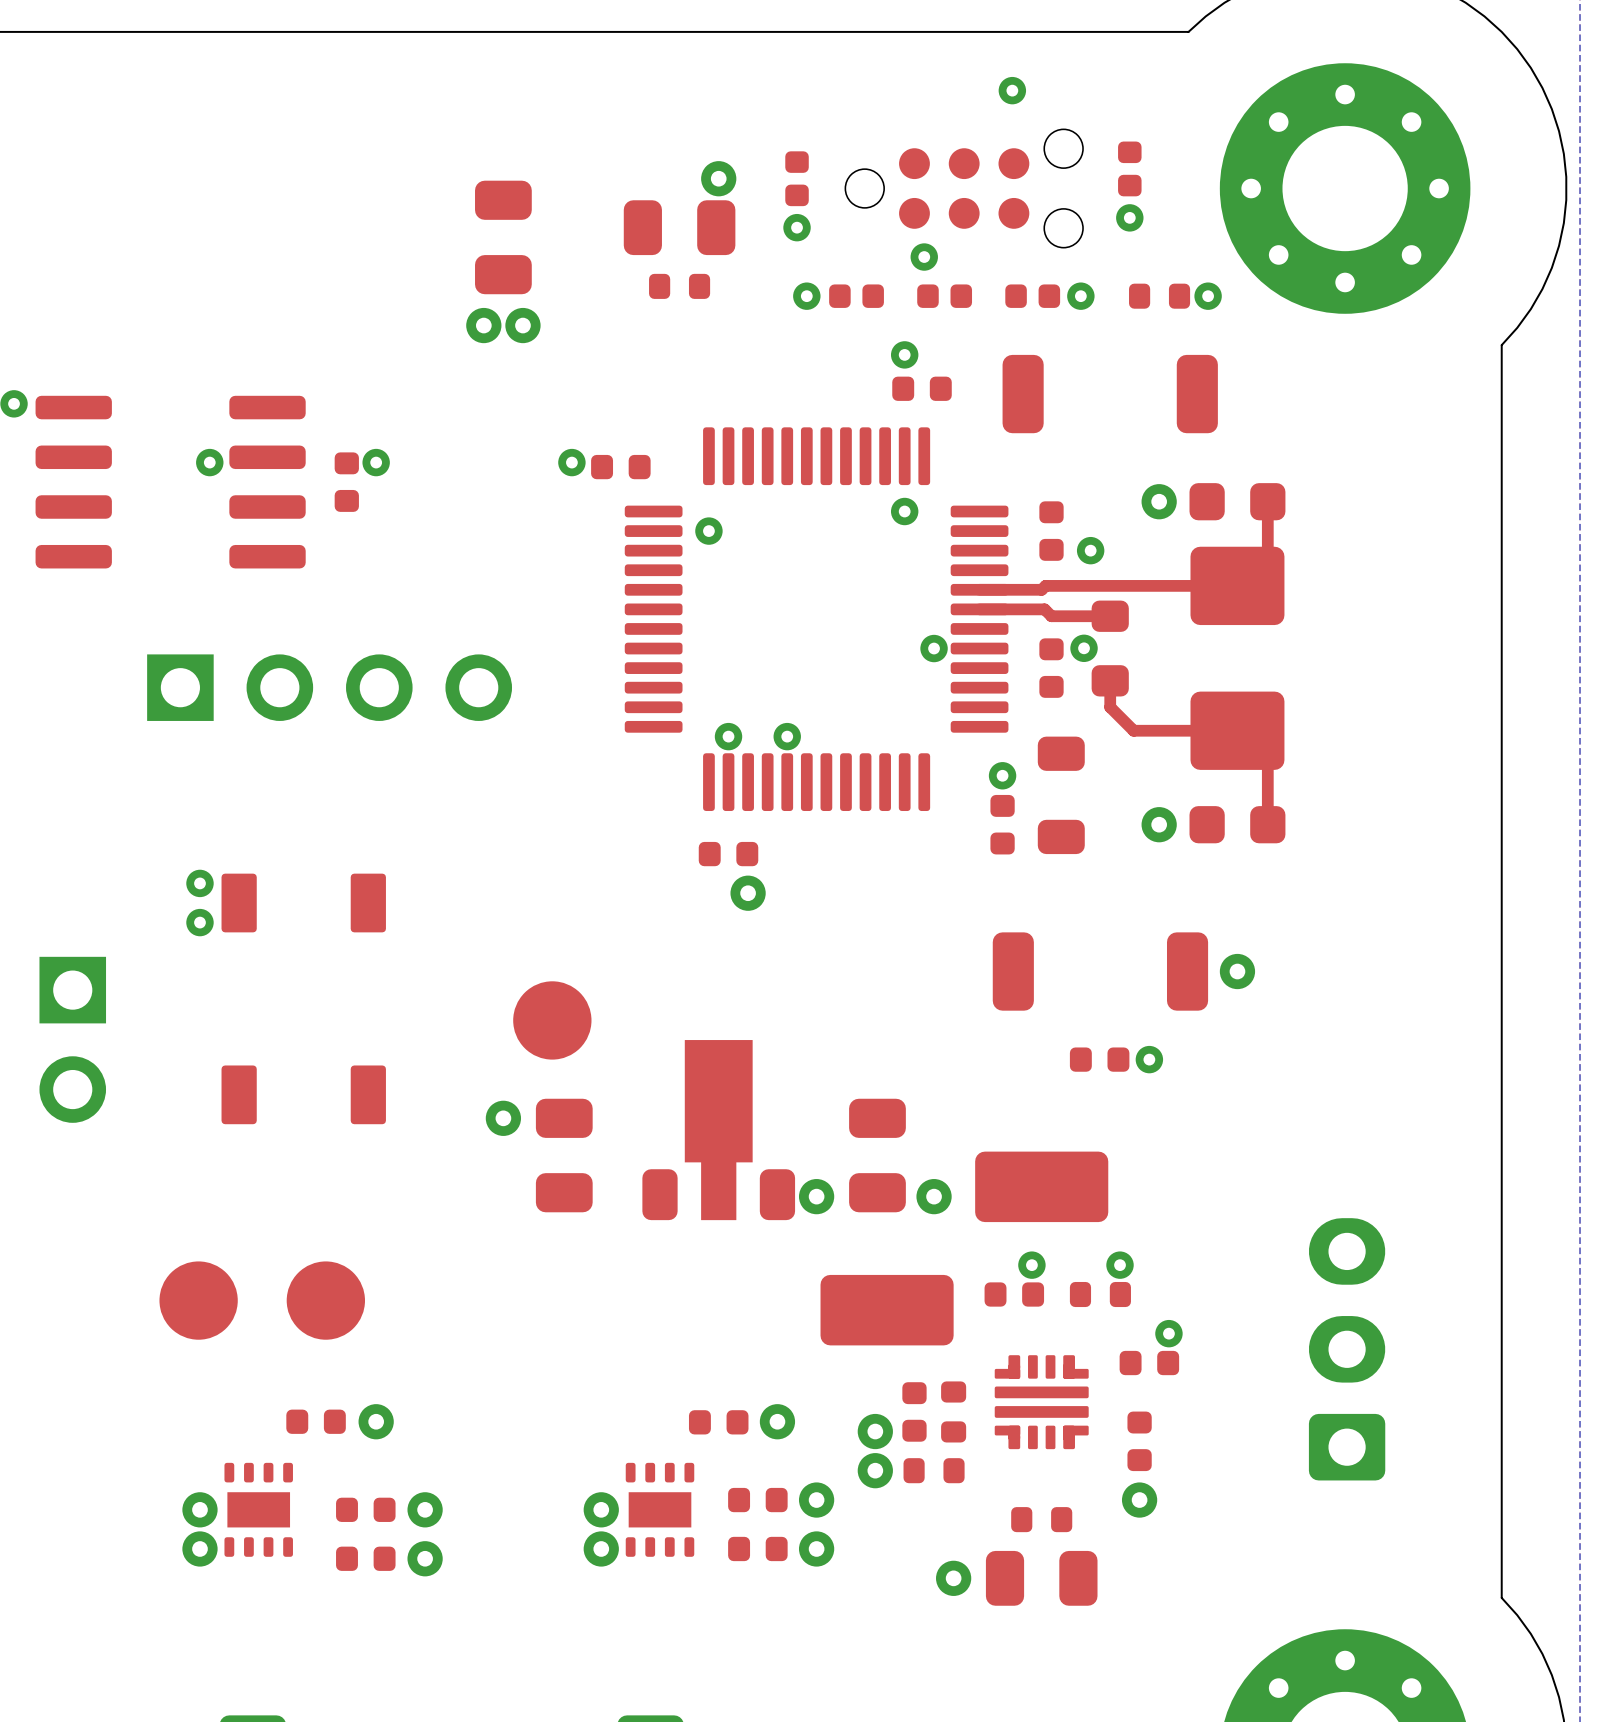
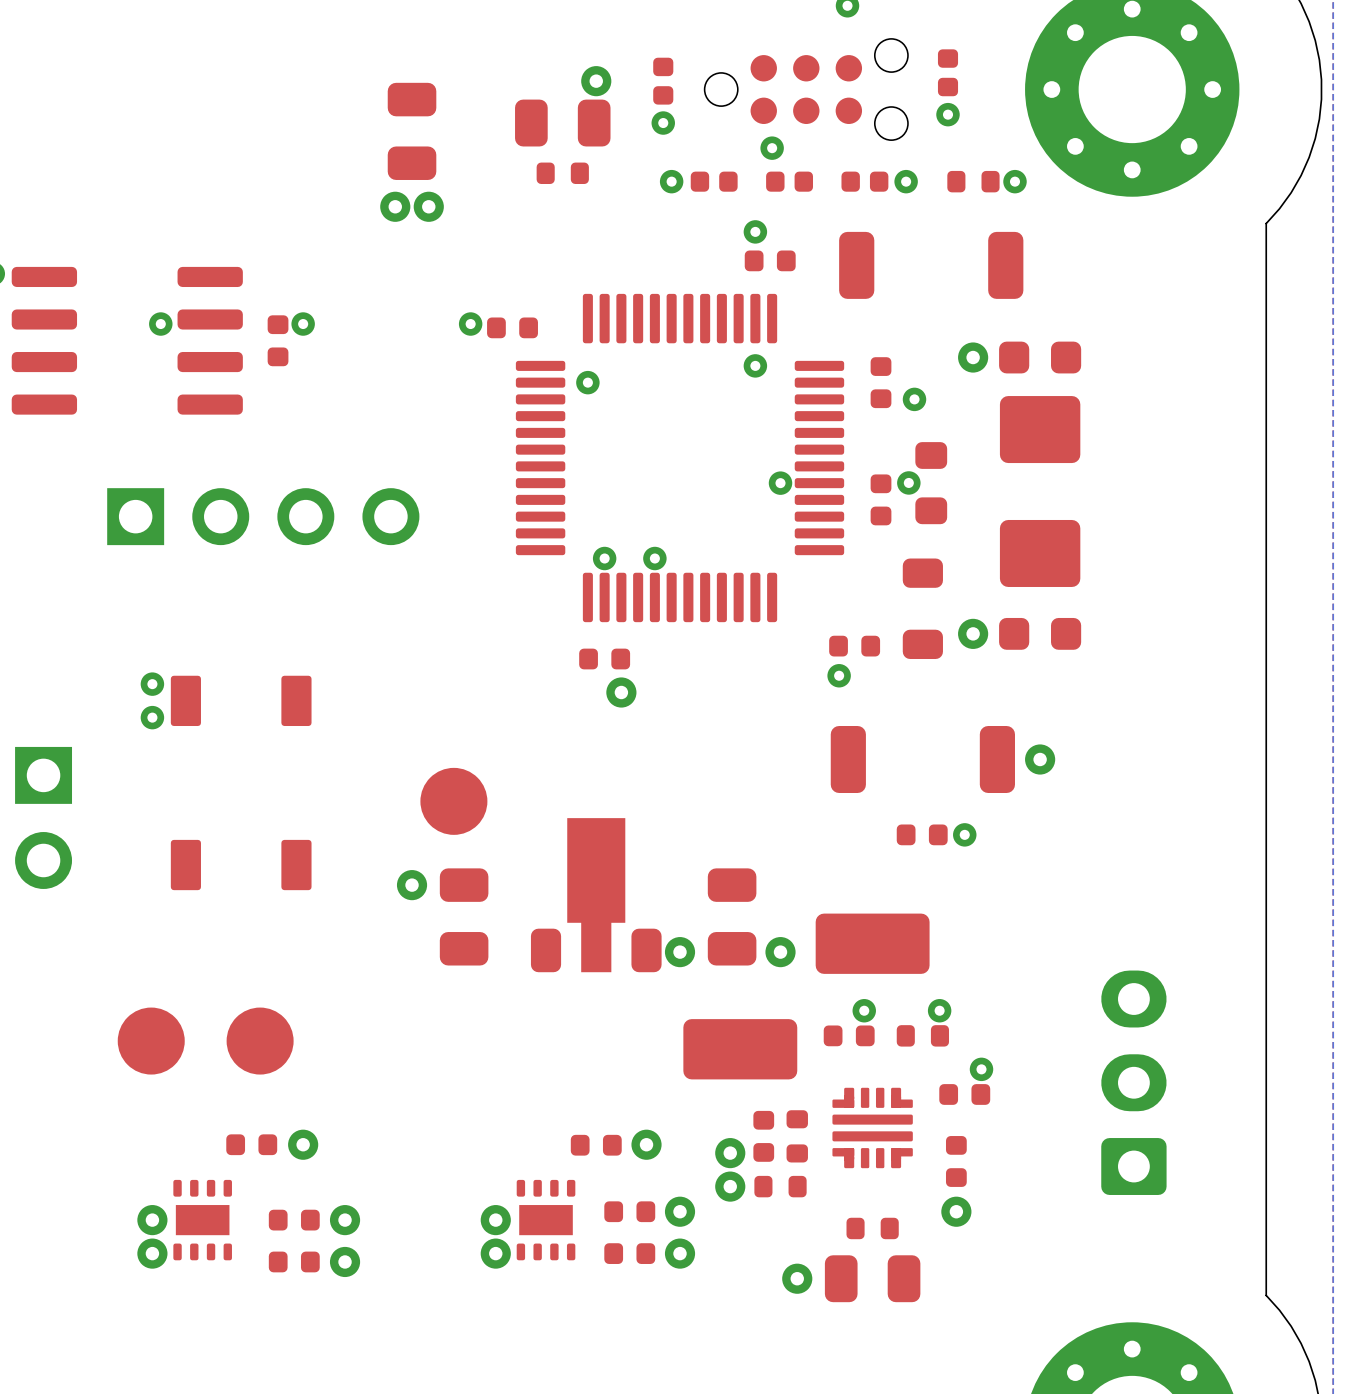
top track: (1267, 501) (1267, 555) (1237, 585) (1045, 585) (1041, 589) (979, 589) -> none
top track: (979, 609) (1044, 609) (1051, 616) (1110, 616) -> none
top track: (1110, 680) (1110, 707) (1133, 730) (1237, 730) (1267, 761) (1267, 824) -> none
via position: (1002, 775) -> (839, 675)
part position: (1061, 795) -> (922, 608)
part rotation: 0° (1002, 824) -> 90° clockwise (854, 646)

